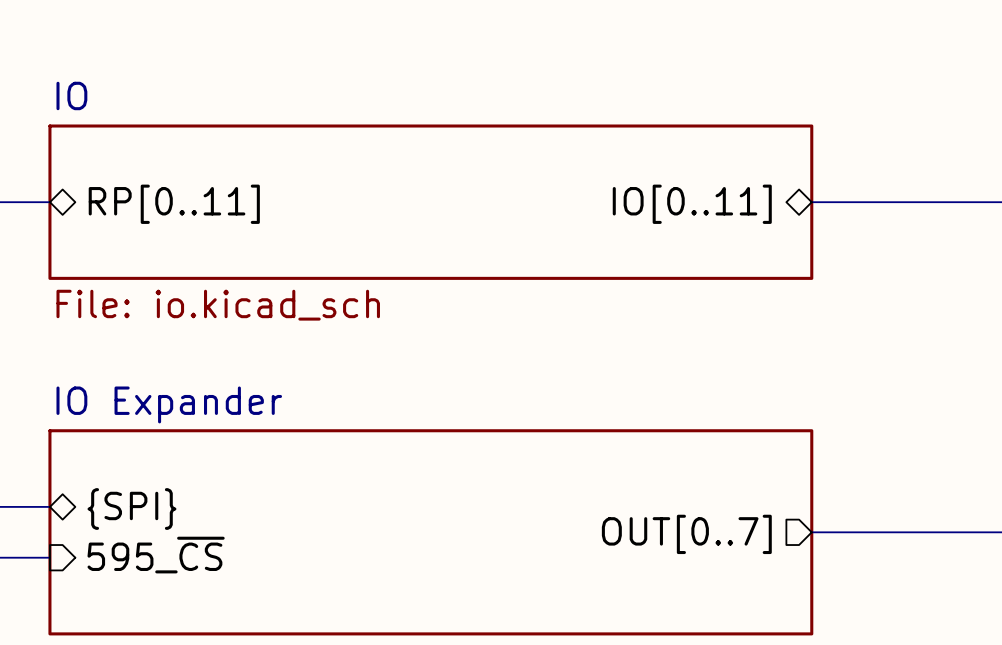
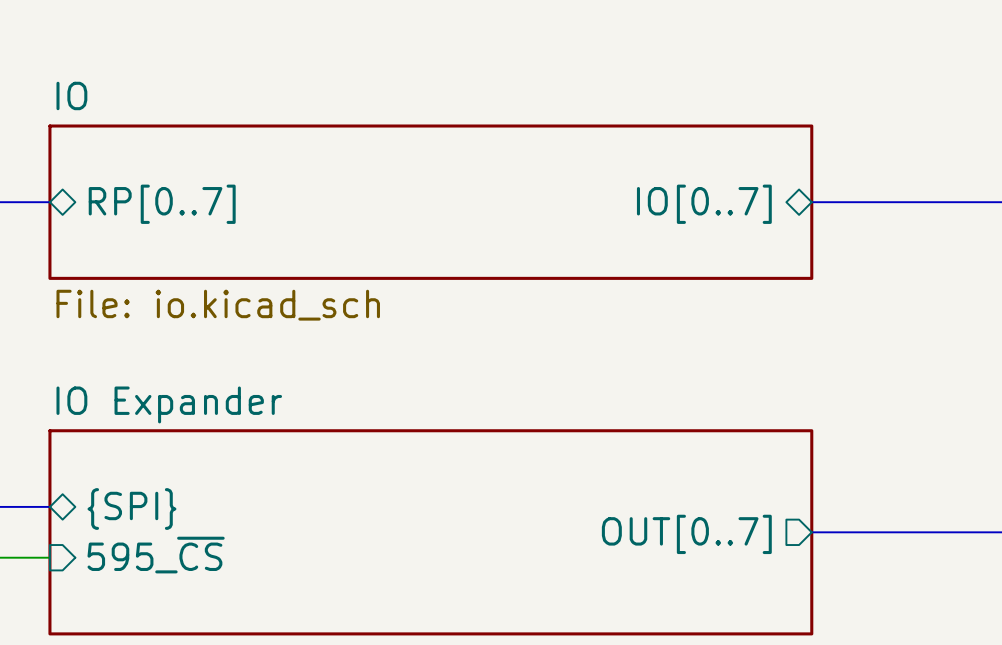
sheet pin: RP[0..11] (174, 204) -> RP[0..7] (162, 204)
sheet pin: IO[0..11] (692, 204) -> IO[0..7] (704, 204)

